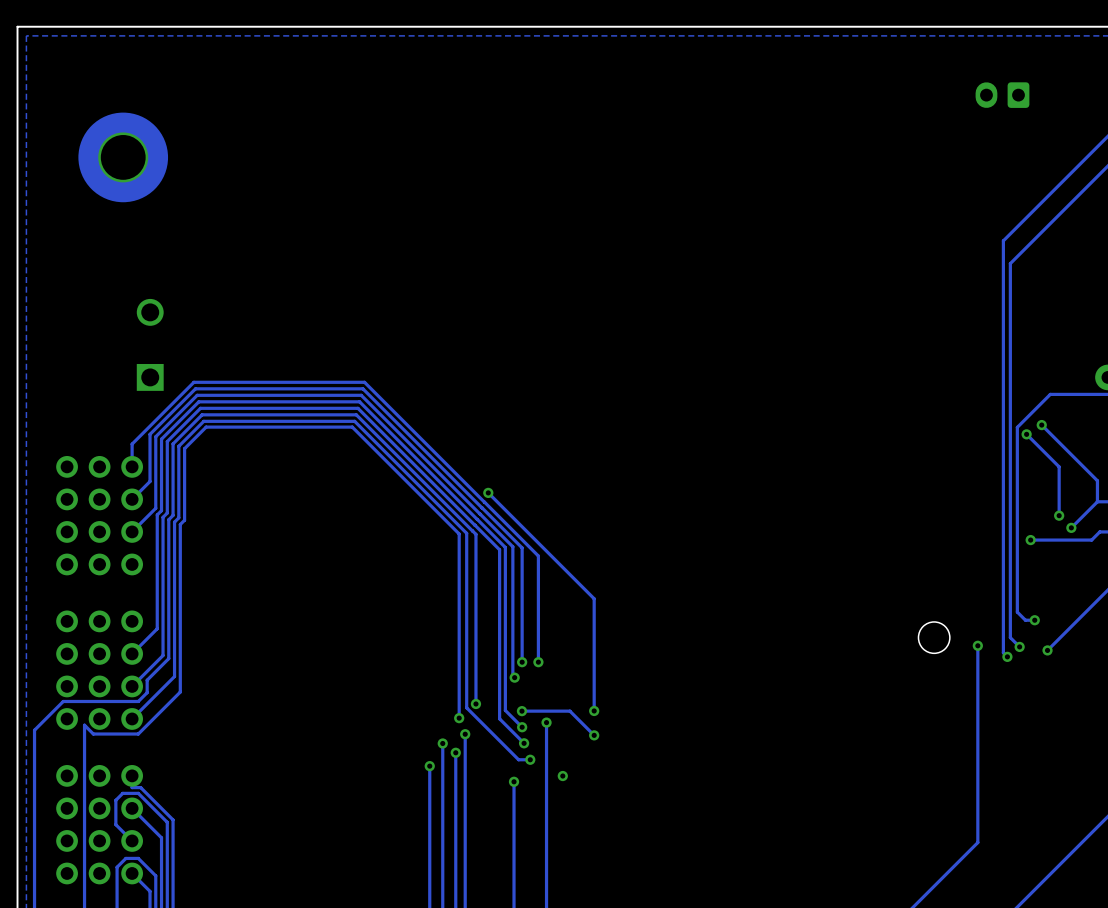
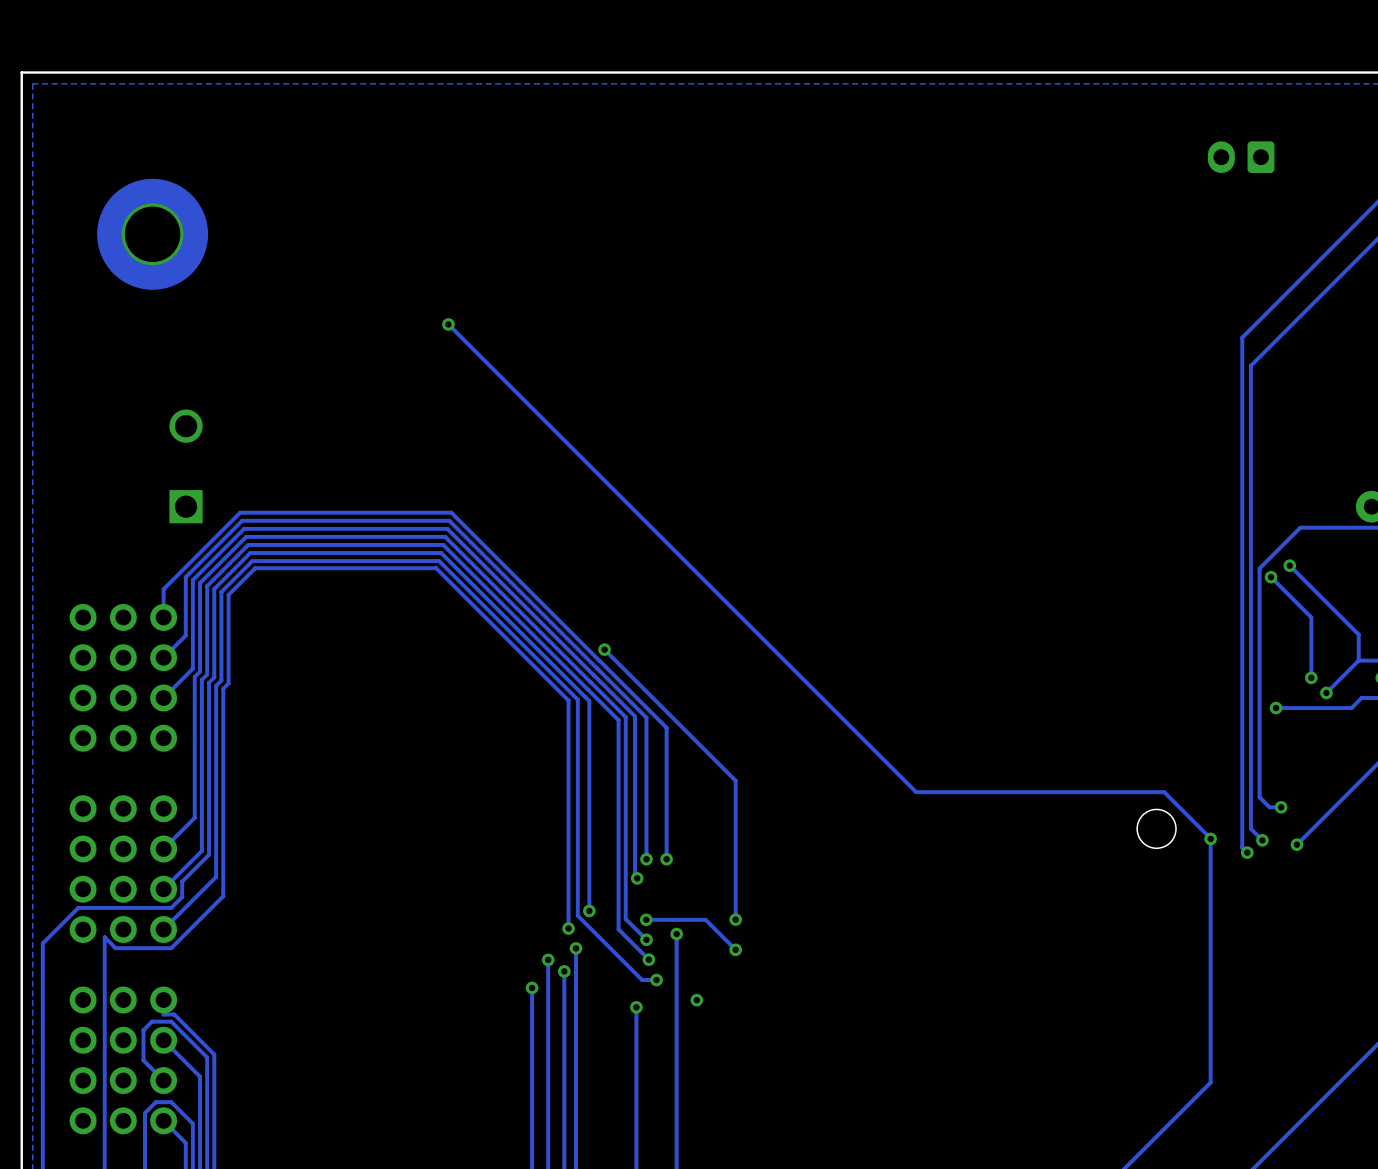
track: none -> (448, 324) (916, 792) (1164, 792) (1210, 838)
via: none -> (448, 324)

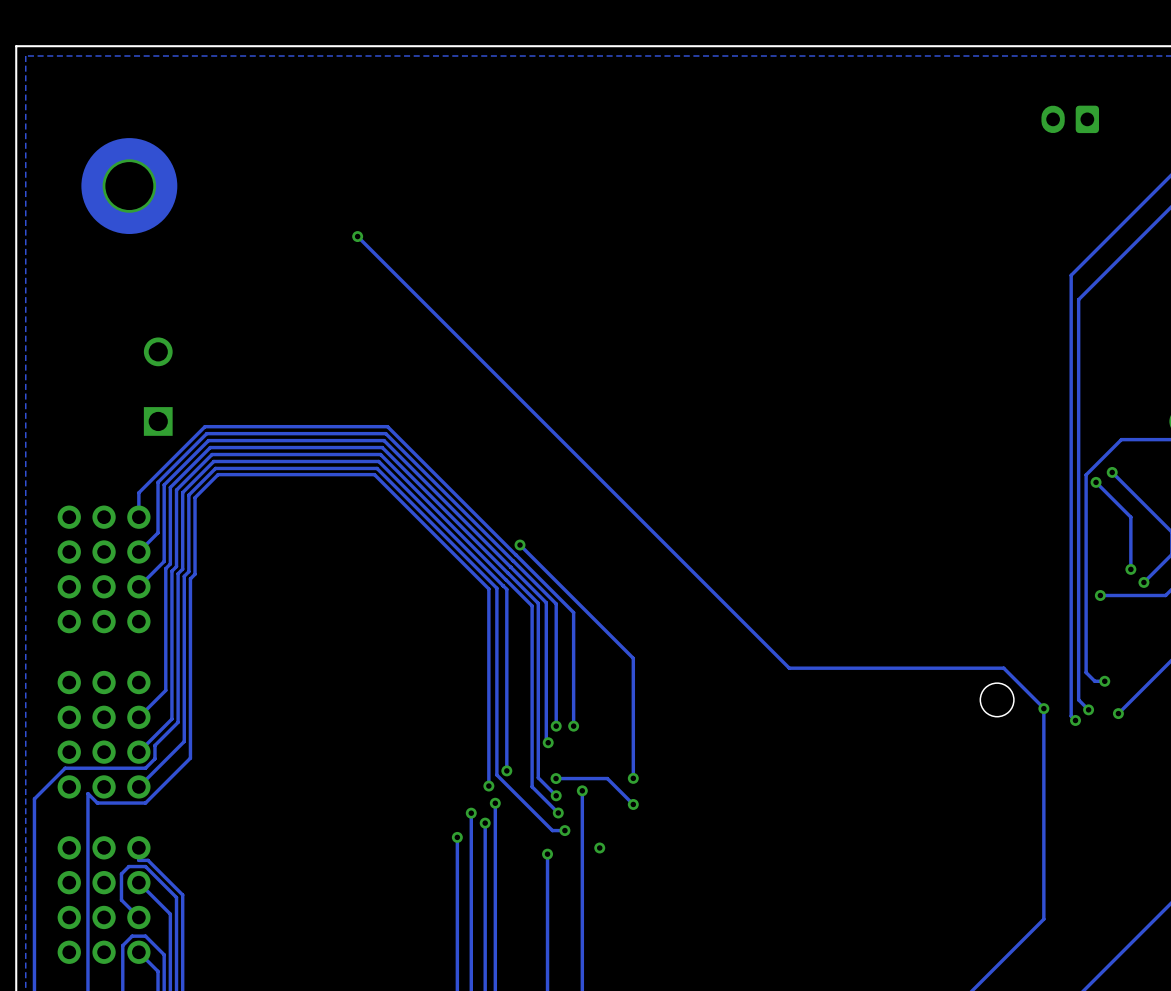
track: none -> (357, 236) (385, 263)
via position: (448, 324) -> (357, 236)

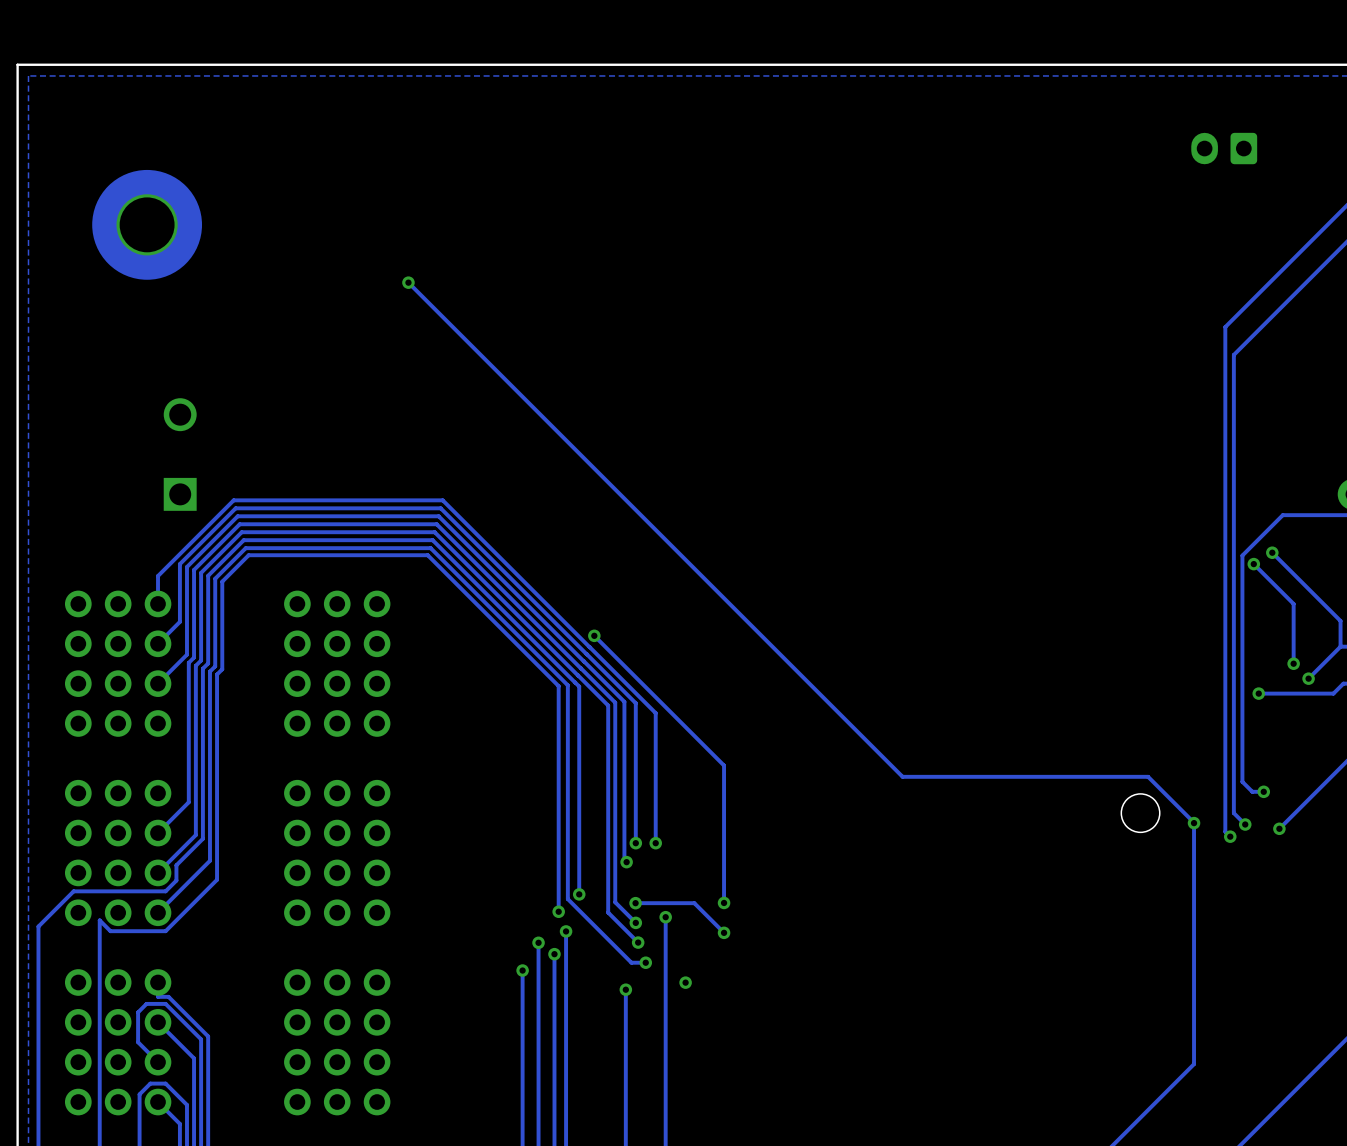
part: none -> (337, 663)
part: none -> (337, 852)
part: none -> (337, 1042)

